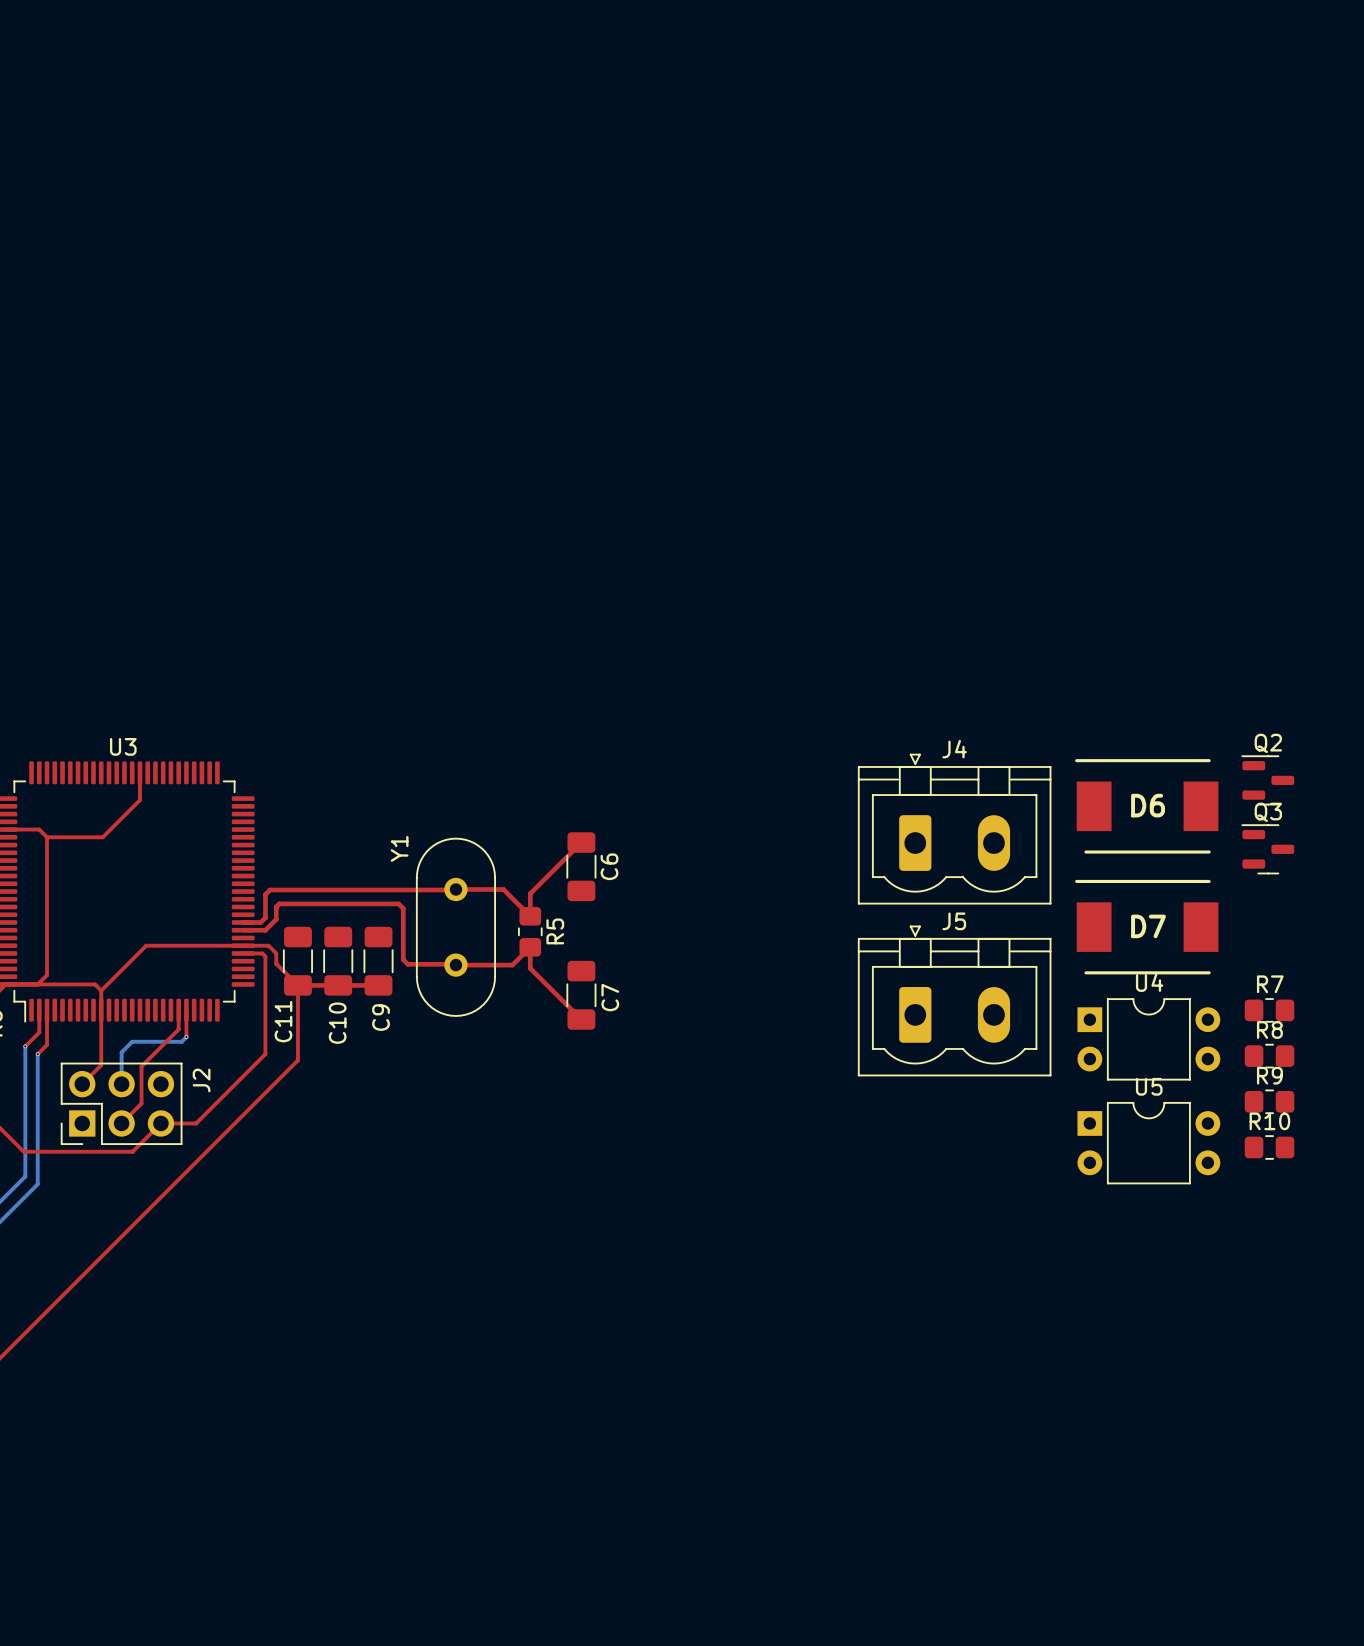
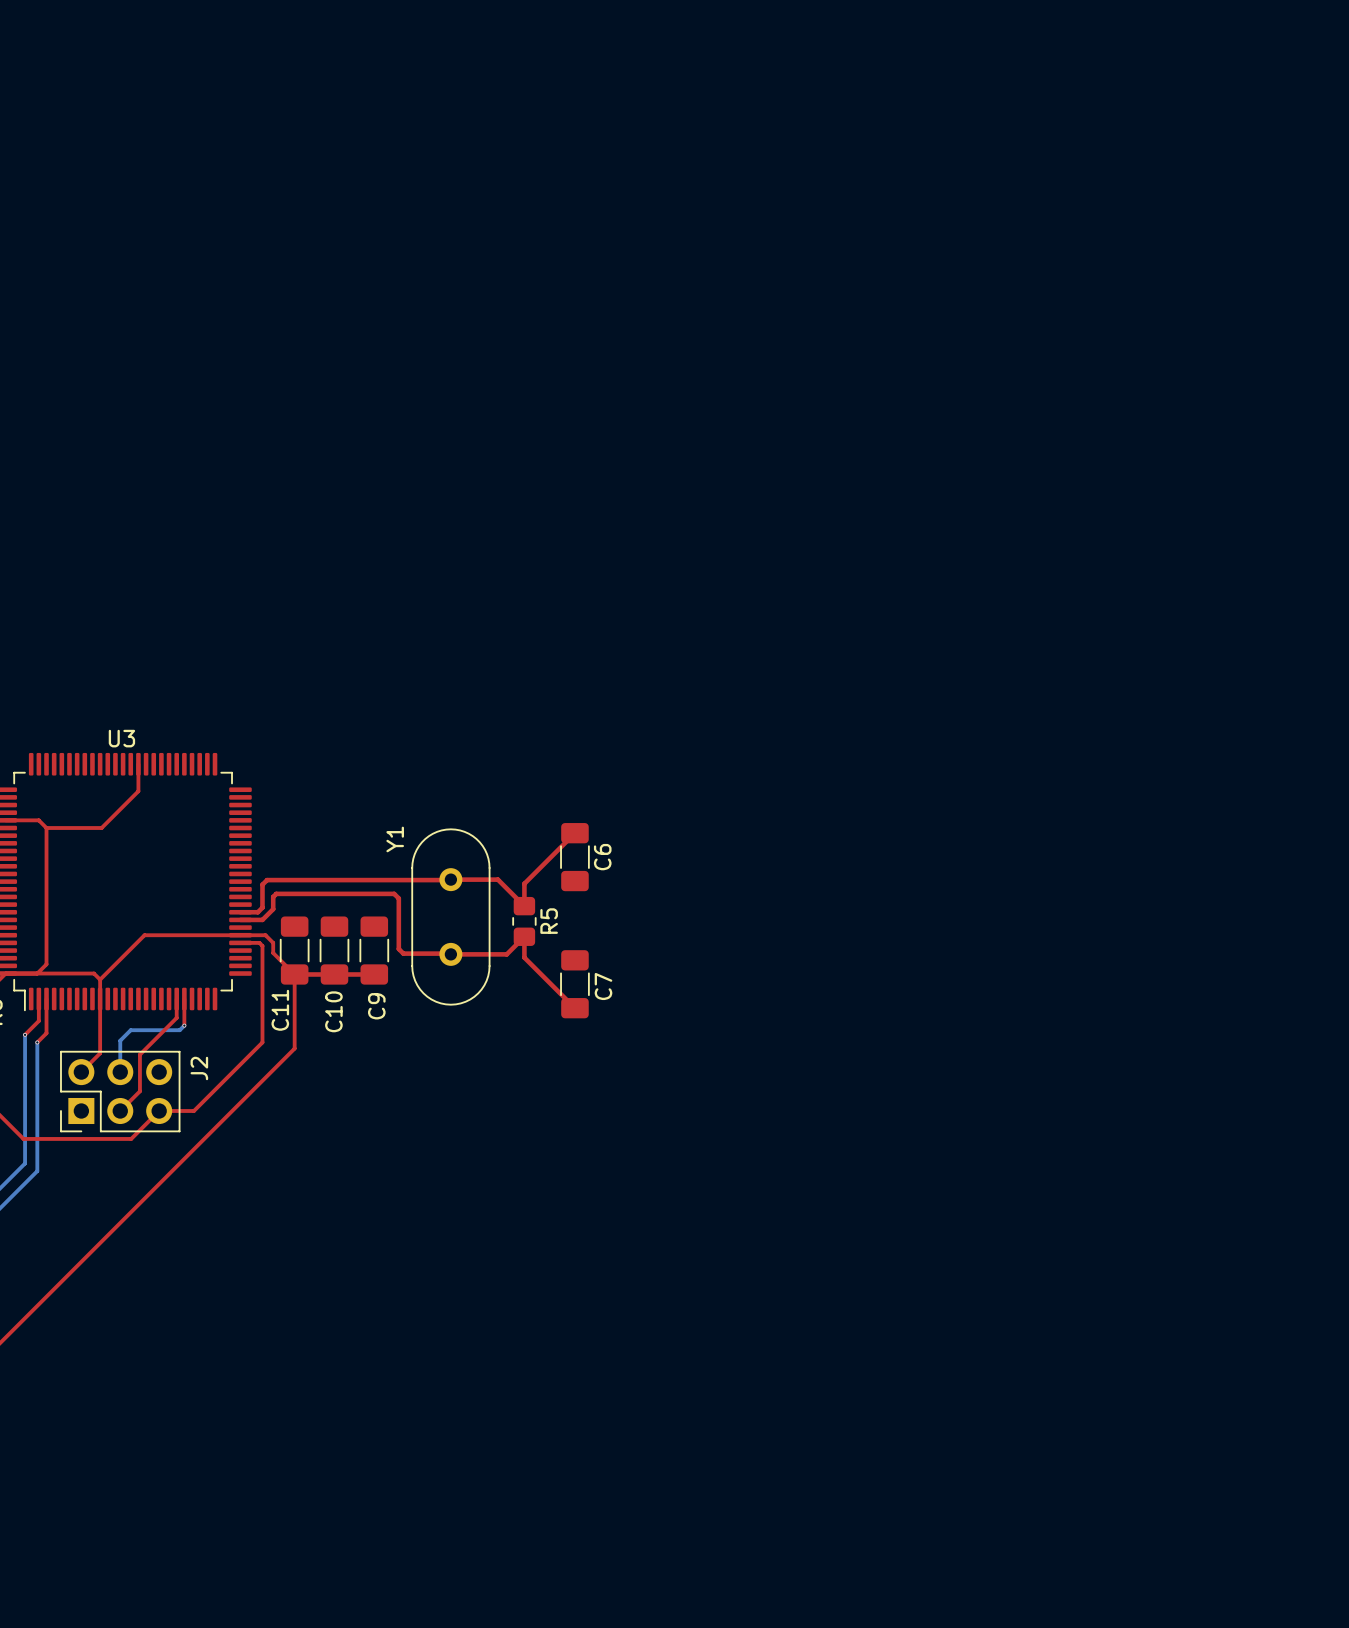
Q2: (1267, 780) -> none
D6: (1146, 806) -> none
J4: (954, 829) -> none
Q3: (1267, 849) -> none
D7: (1146, 927) -> none
J5: (954, 1000) -> none
R7: (1269, 1010) -> none
U4: (1148, 1039) -> none
R8: (1269, 1056) -> none
R9: (1269, 1101) -> none
U5: (1148, 1143) -> none
R10: (1269, 1147) -> none

